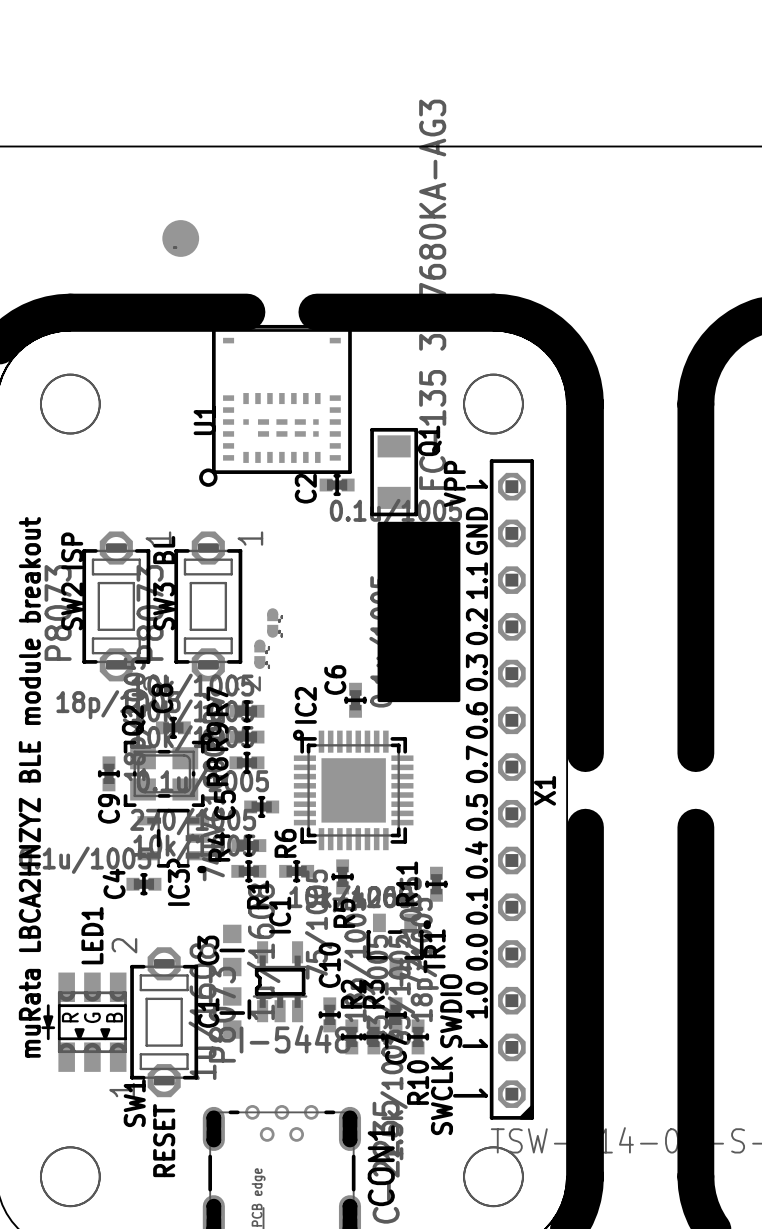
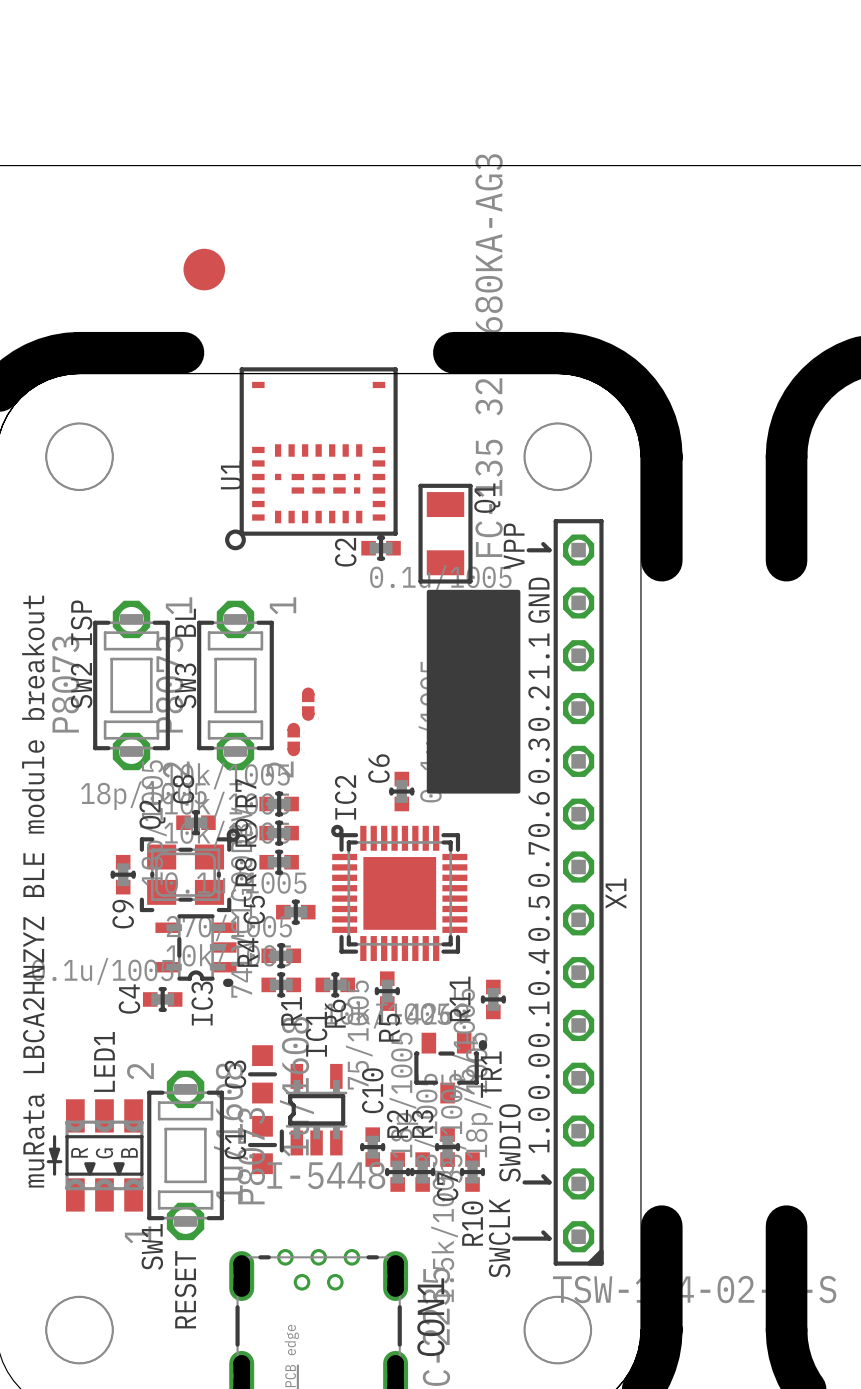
board edge: (162, 312) (246, 312) -> none
board edge: (316, 312) (401, 312) -> none
board edge: (585, 496) (585, 753) -> none
board edge: (695, 496) (695, 753) -> none
board edge: (585, 827) (585, 1084) -> none
board edge: (695, 827) (695, 1084) -> none
R6 name position: R6 (285, 843) -> R6 (335, 1013)

